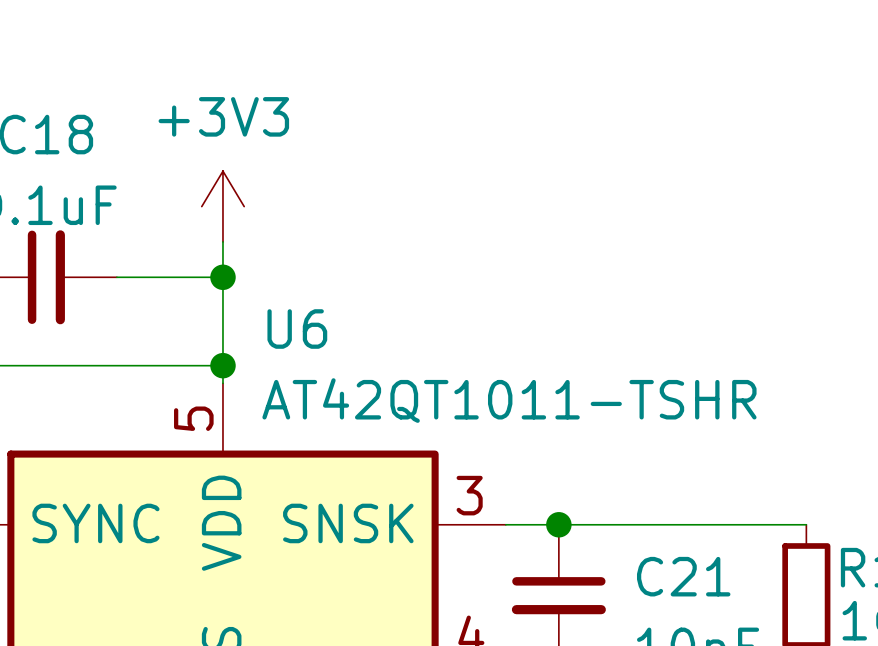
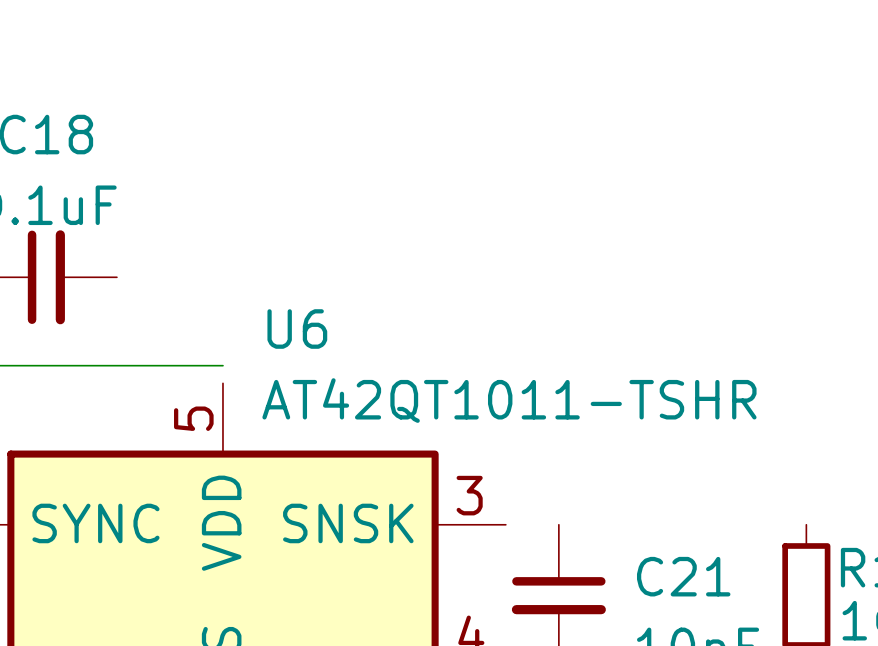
power symbol: +3V3 (222, 206) -> none
wire: (222, 241) (222, 383) -> none
wire: (116, 277) (222, 277) -> none
junction: (222, 277) -> none
junction: (222, 365) -> none
wire: (505, 524) (806, 524) -> none
junction: (558, 524) -> none

